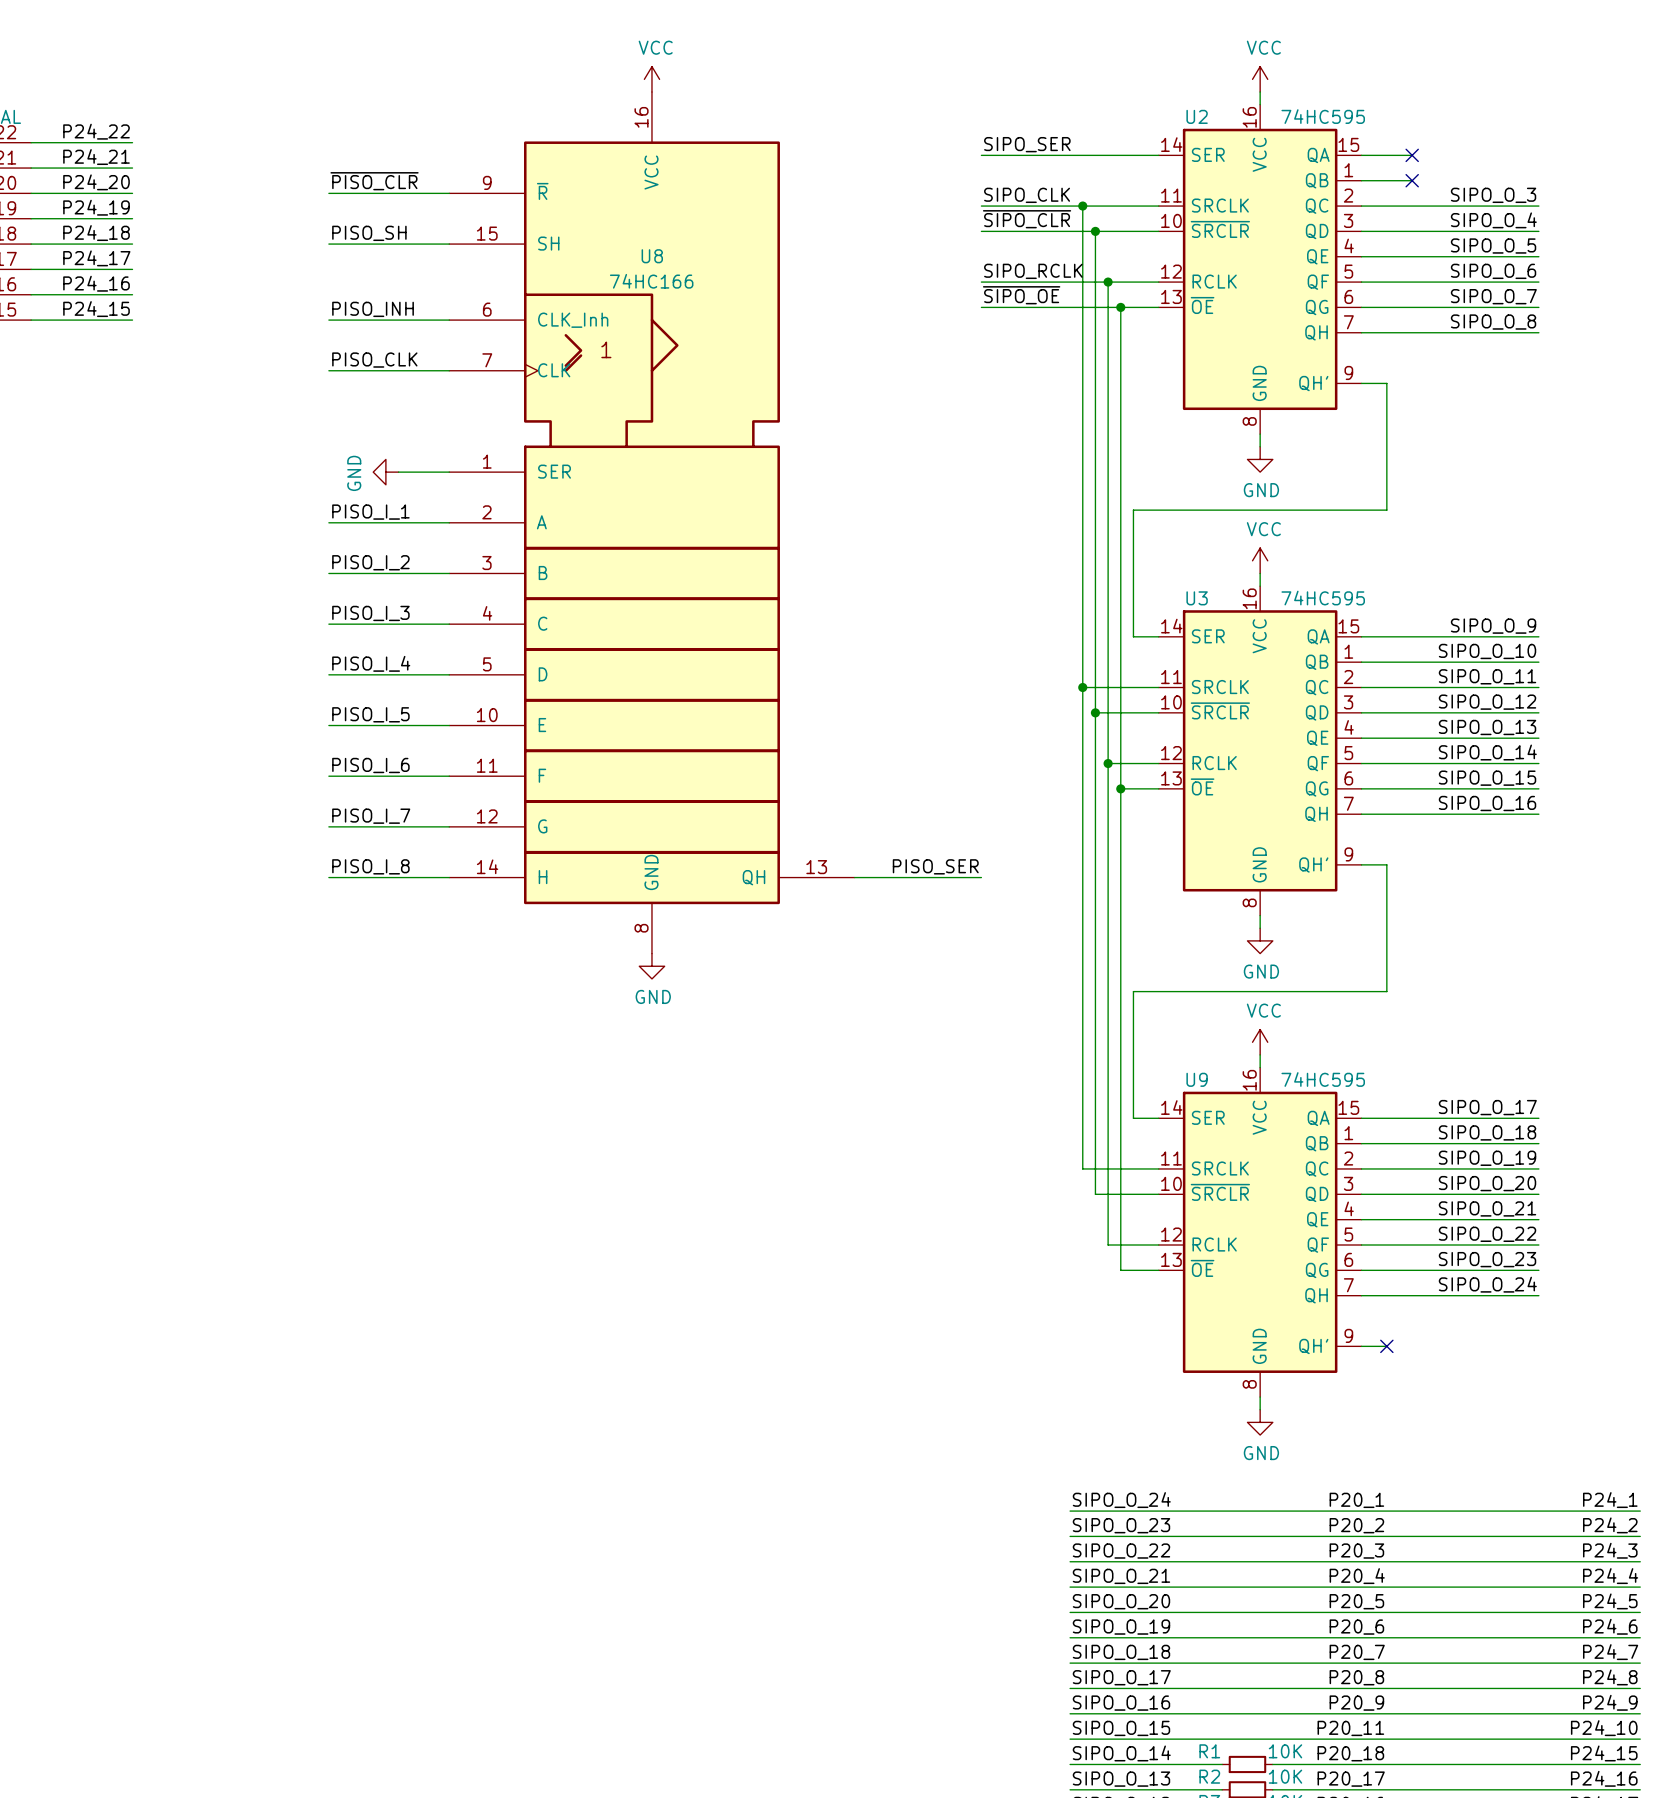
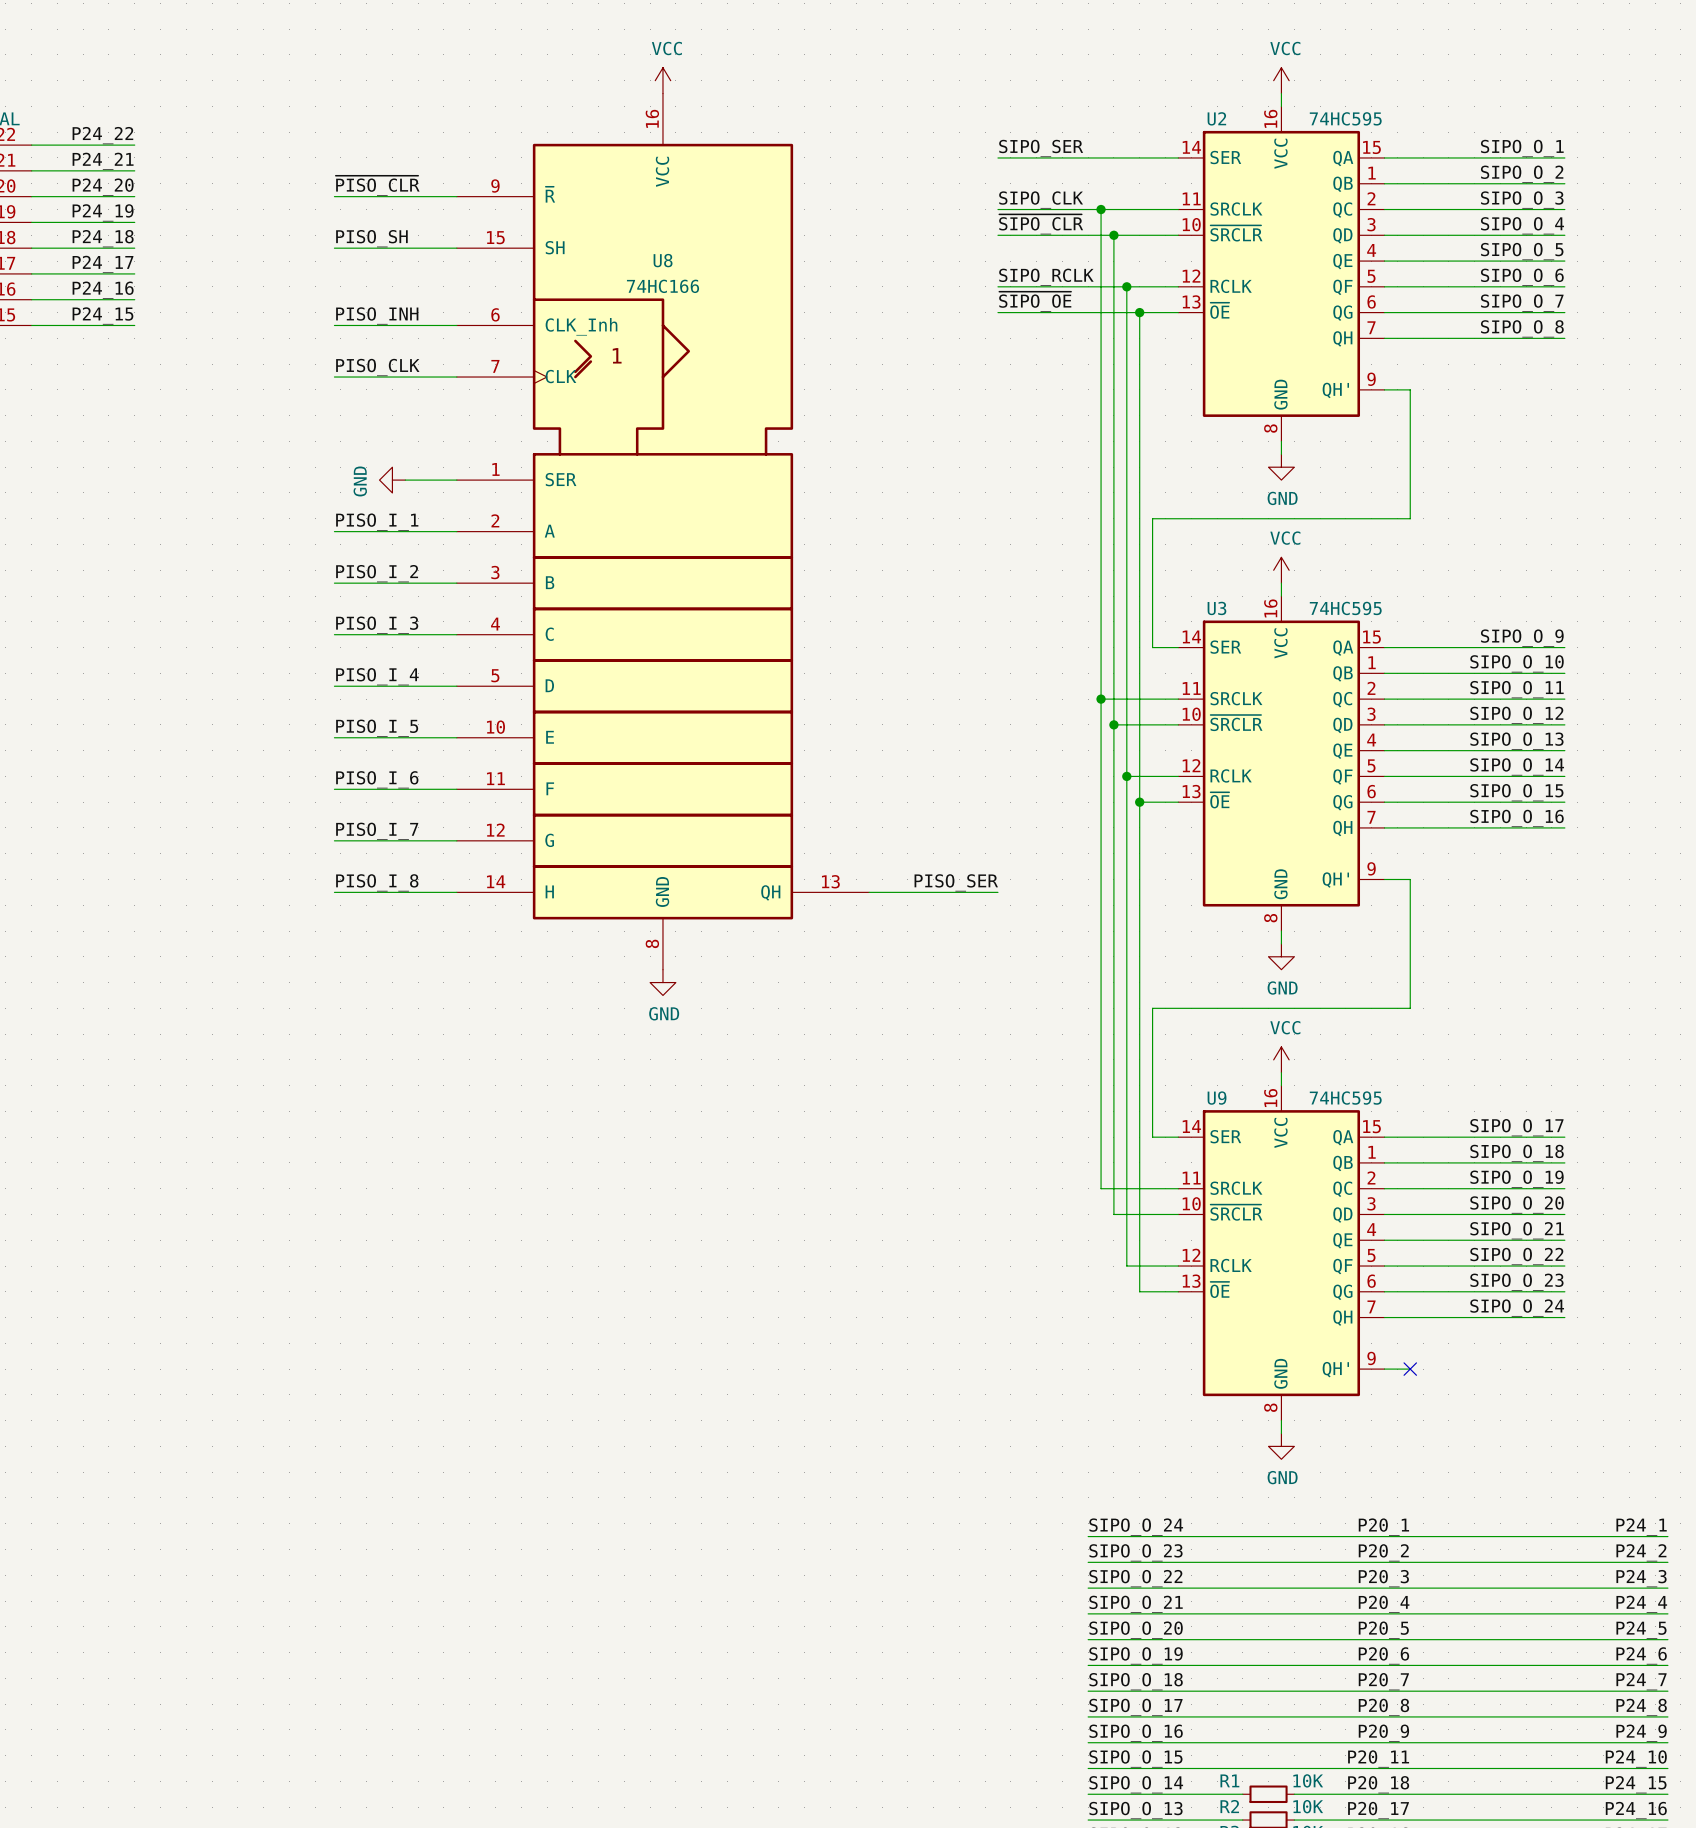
label: none -> SIPO_O_1 (1522, 148)
wire: none -> (1436, 157) (1564, 157)
no-connect mark: (1412, 155) -> none
label: none -> SIPO_O_2 (1522, 174)
wire: none -> (1436, 183) (1564, 183)
no-connect mark: (1412, 180) -> none

